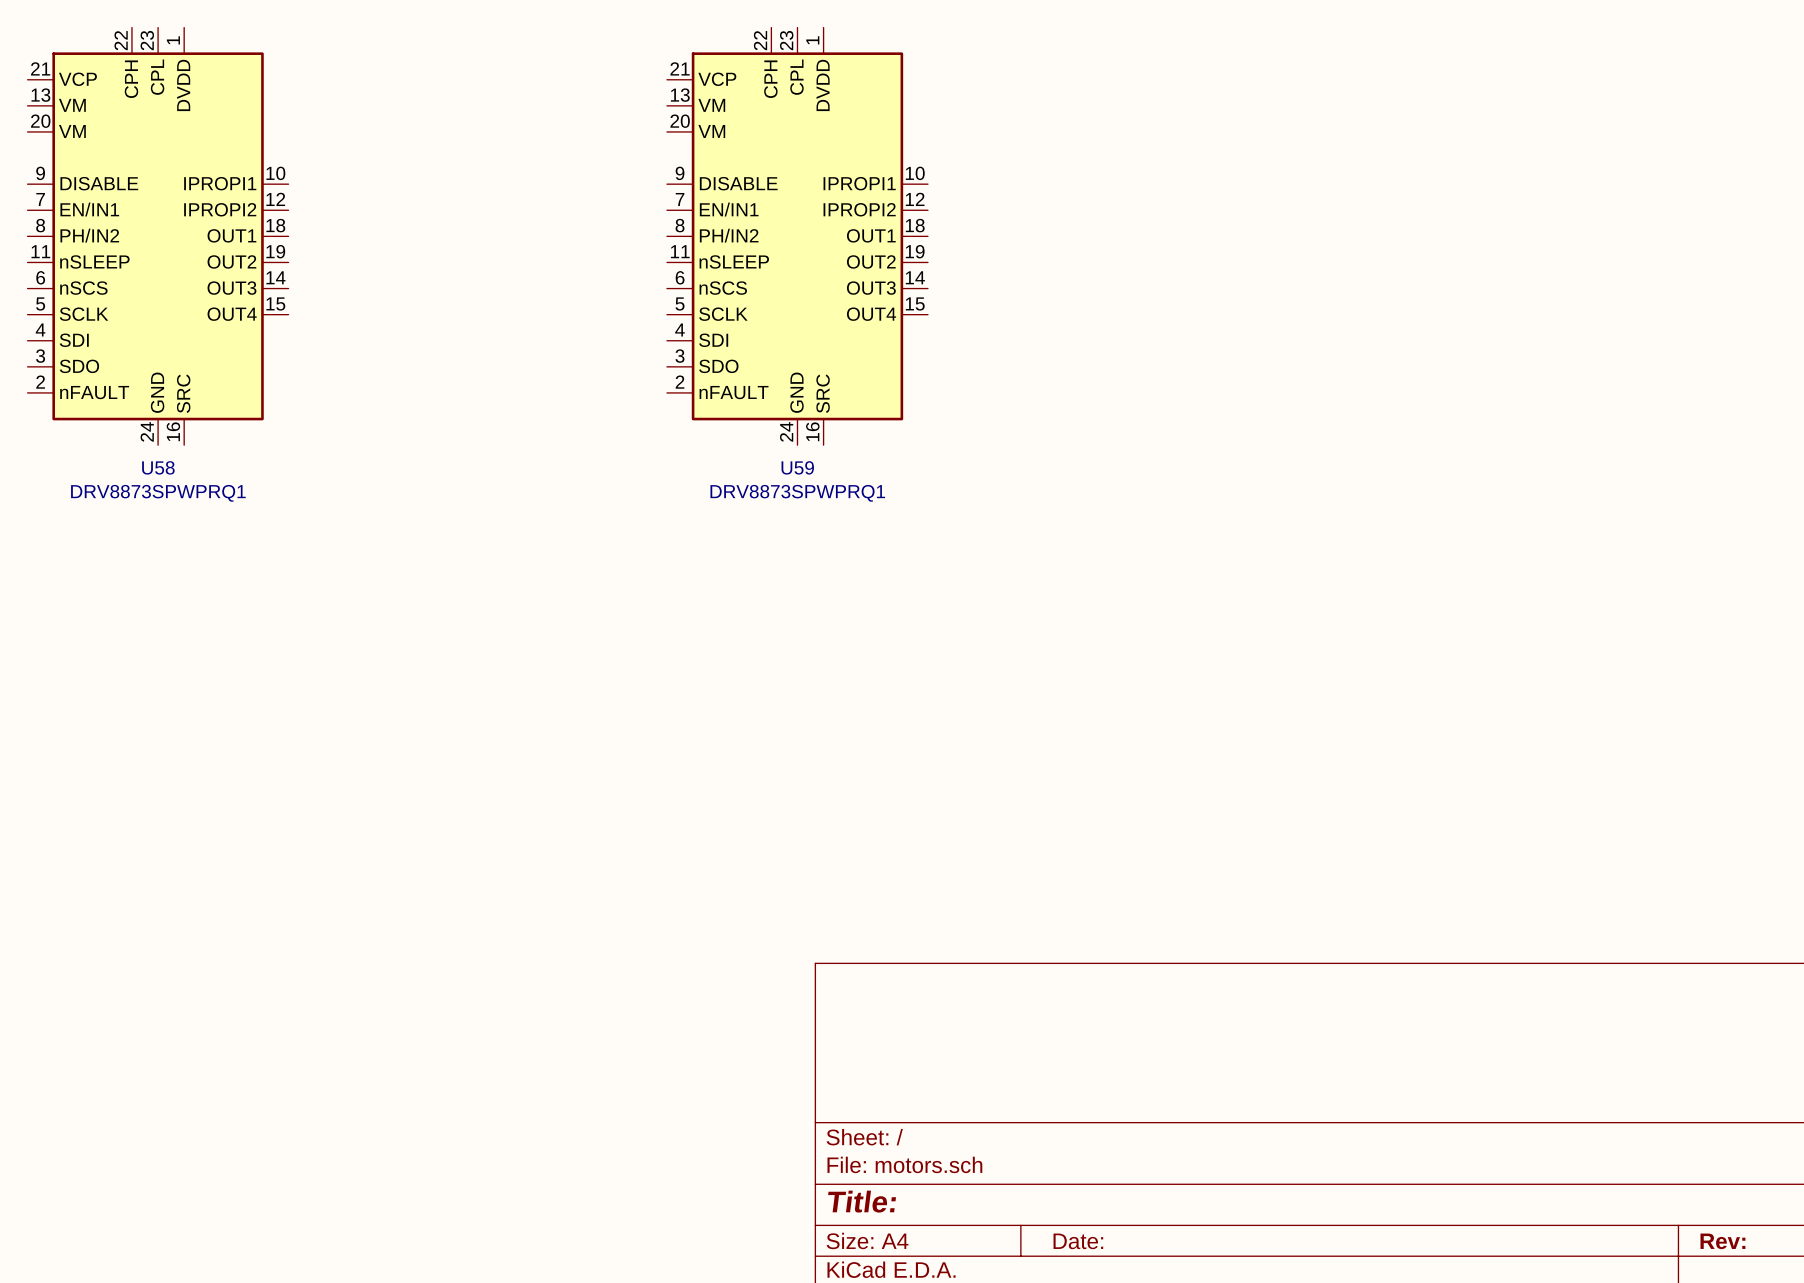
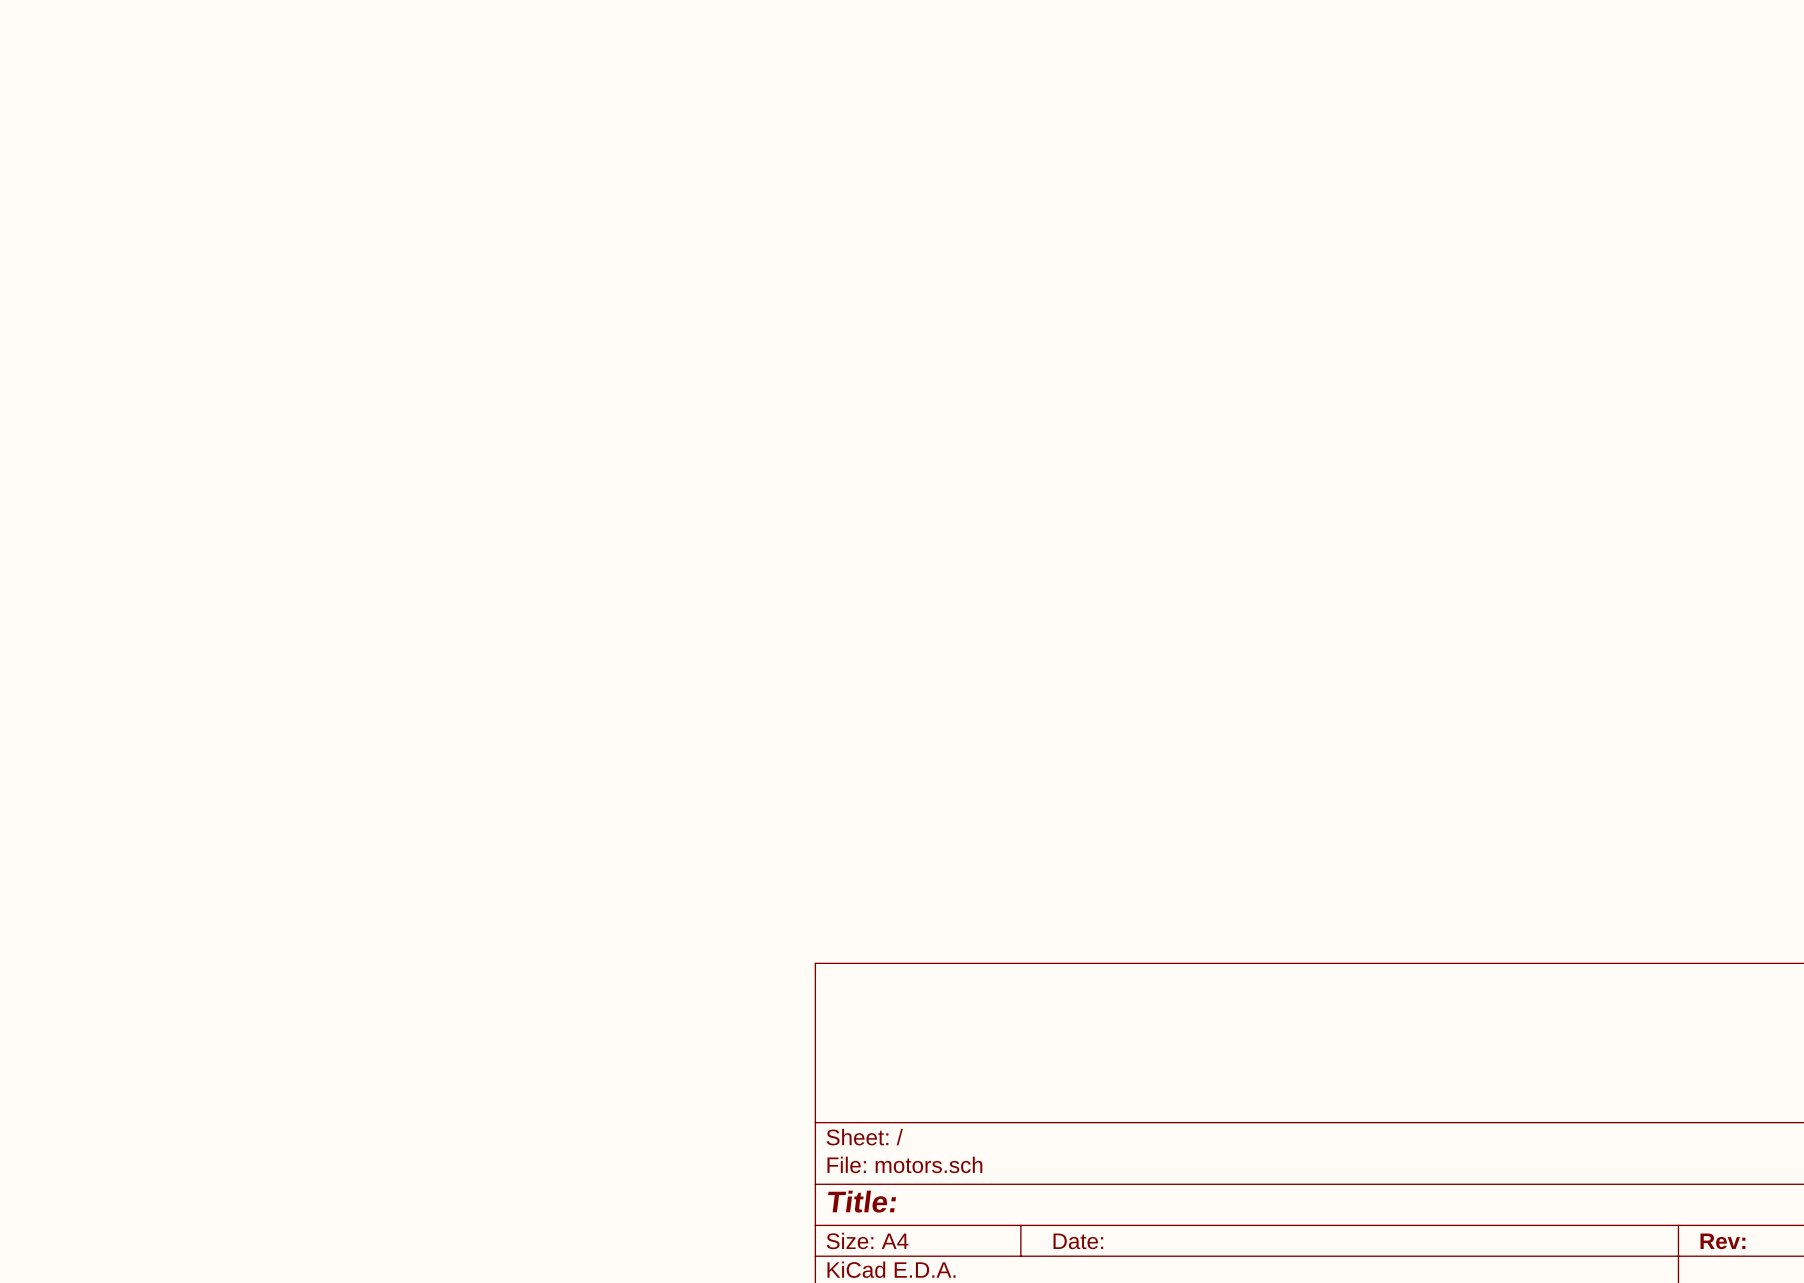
U58: DRV8873SPWPRQ1 (158, 236) -> none
U59: DRV8873SPWPRQ1 (797, 236) -> none

